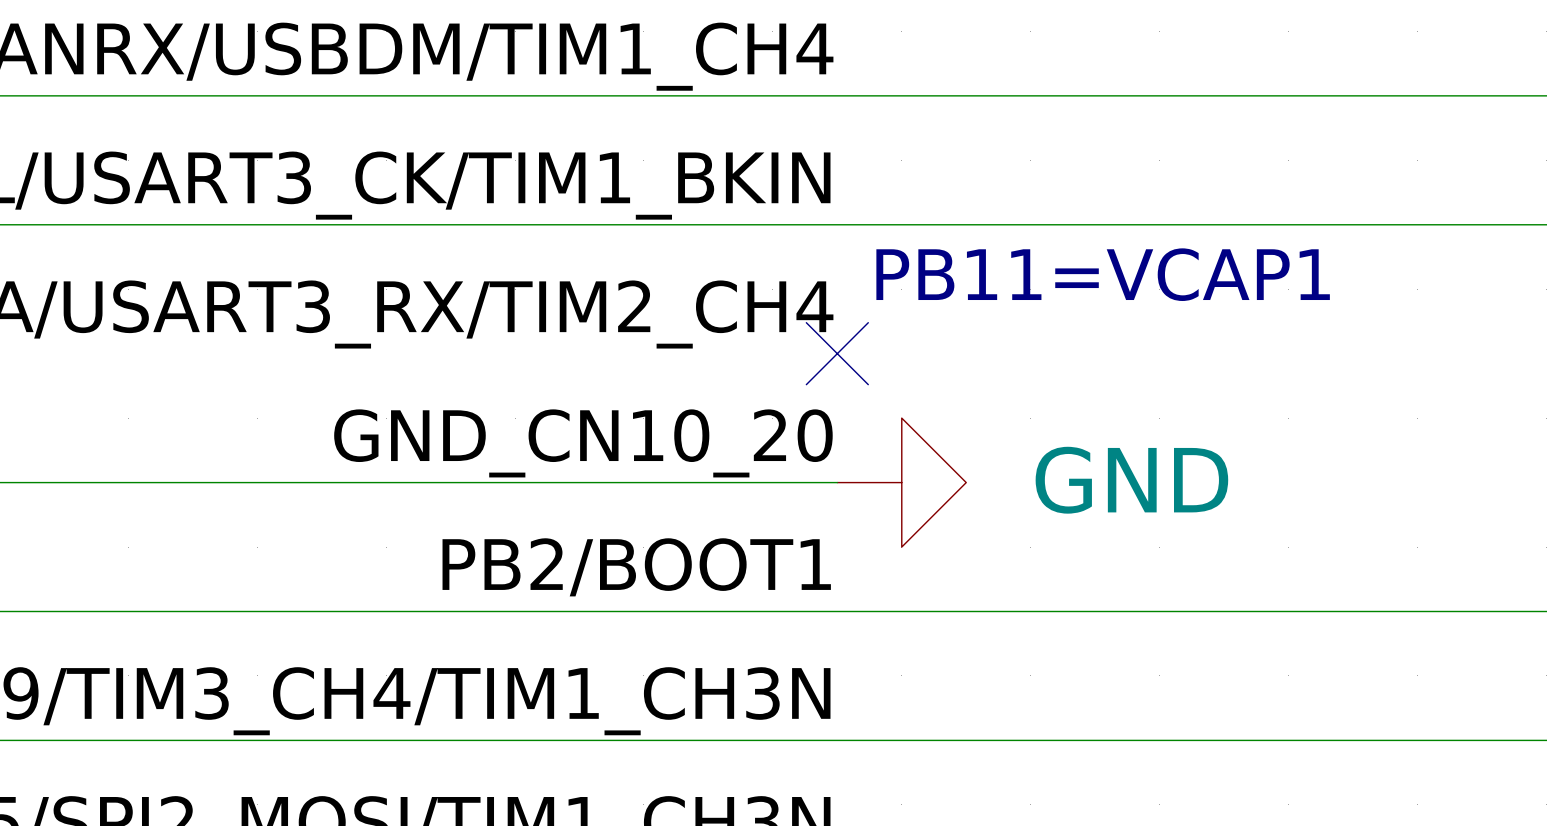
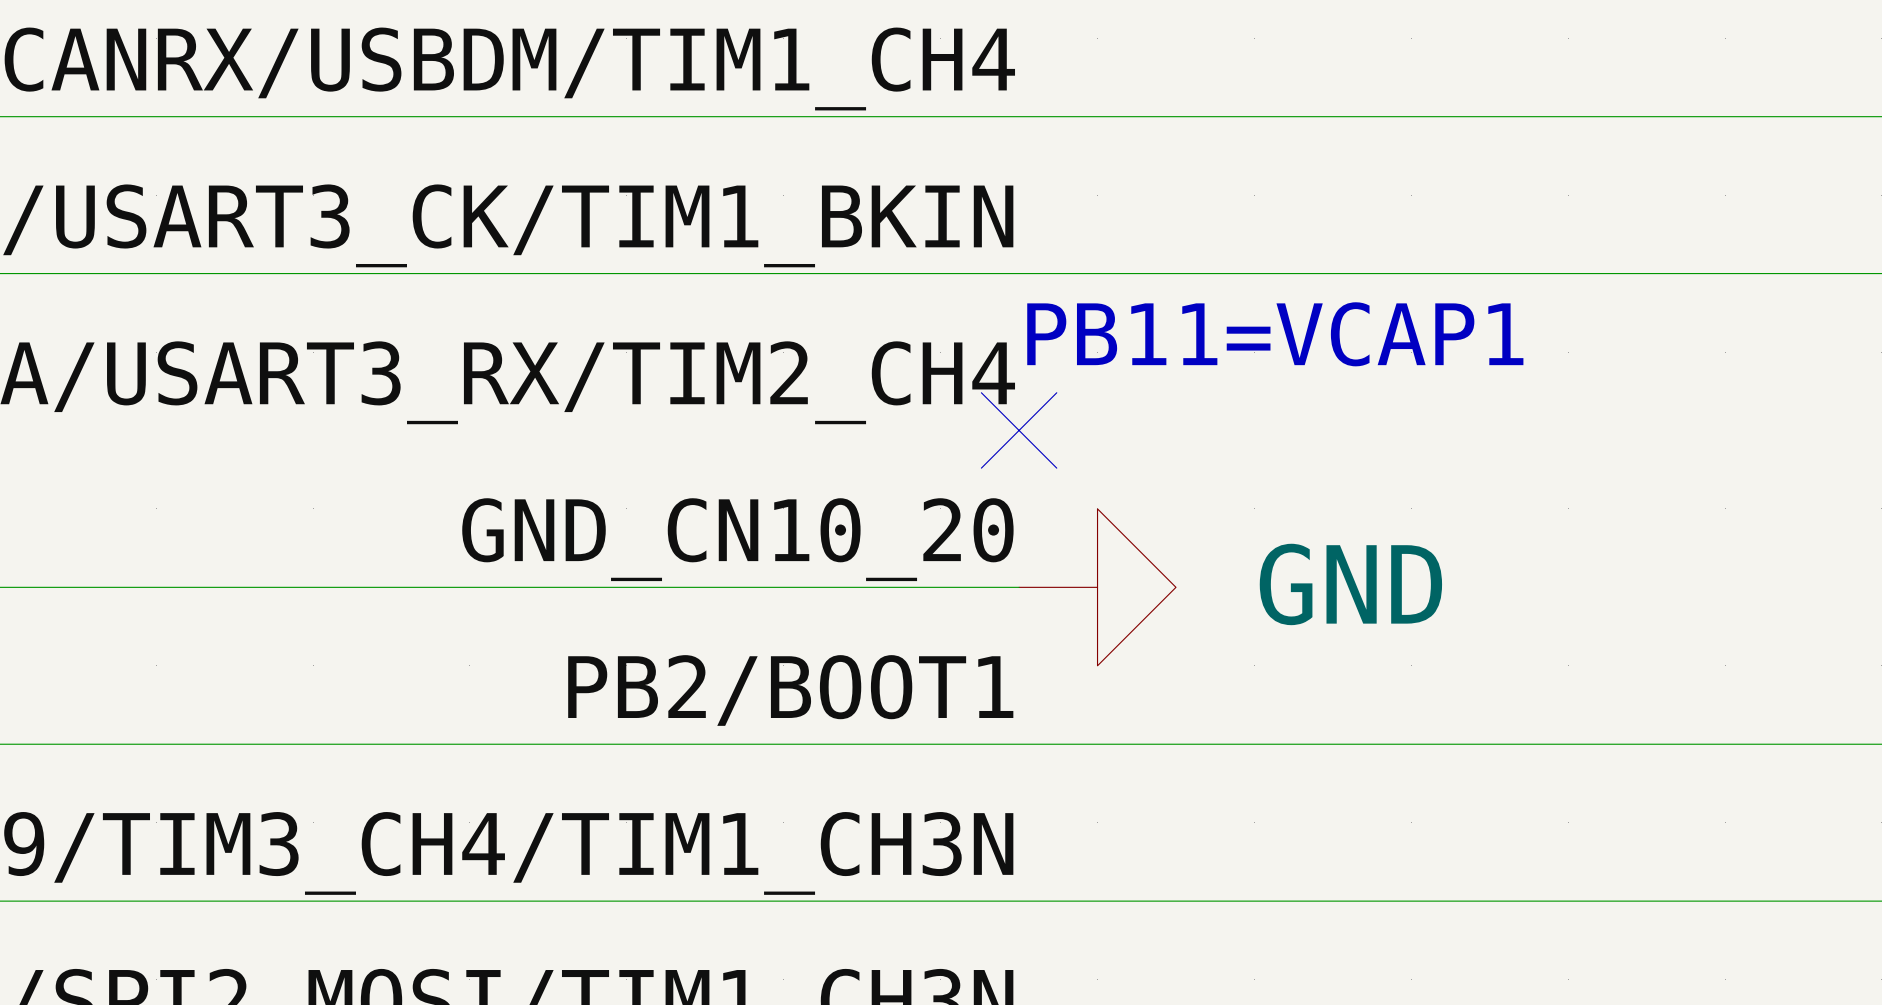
text position: PB11=VCAP1 (1103, 274) -> PB11=VCAP1 (1275, 334)

